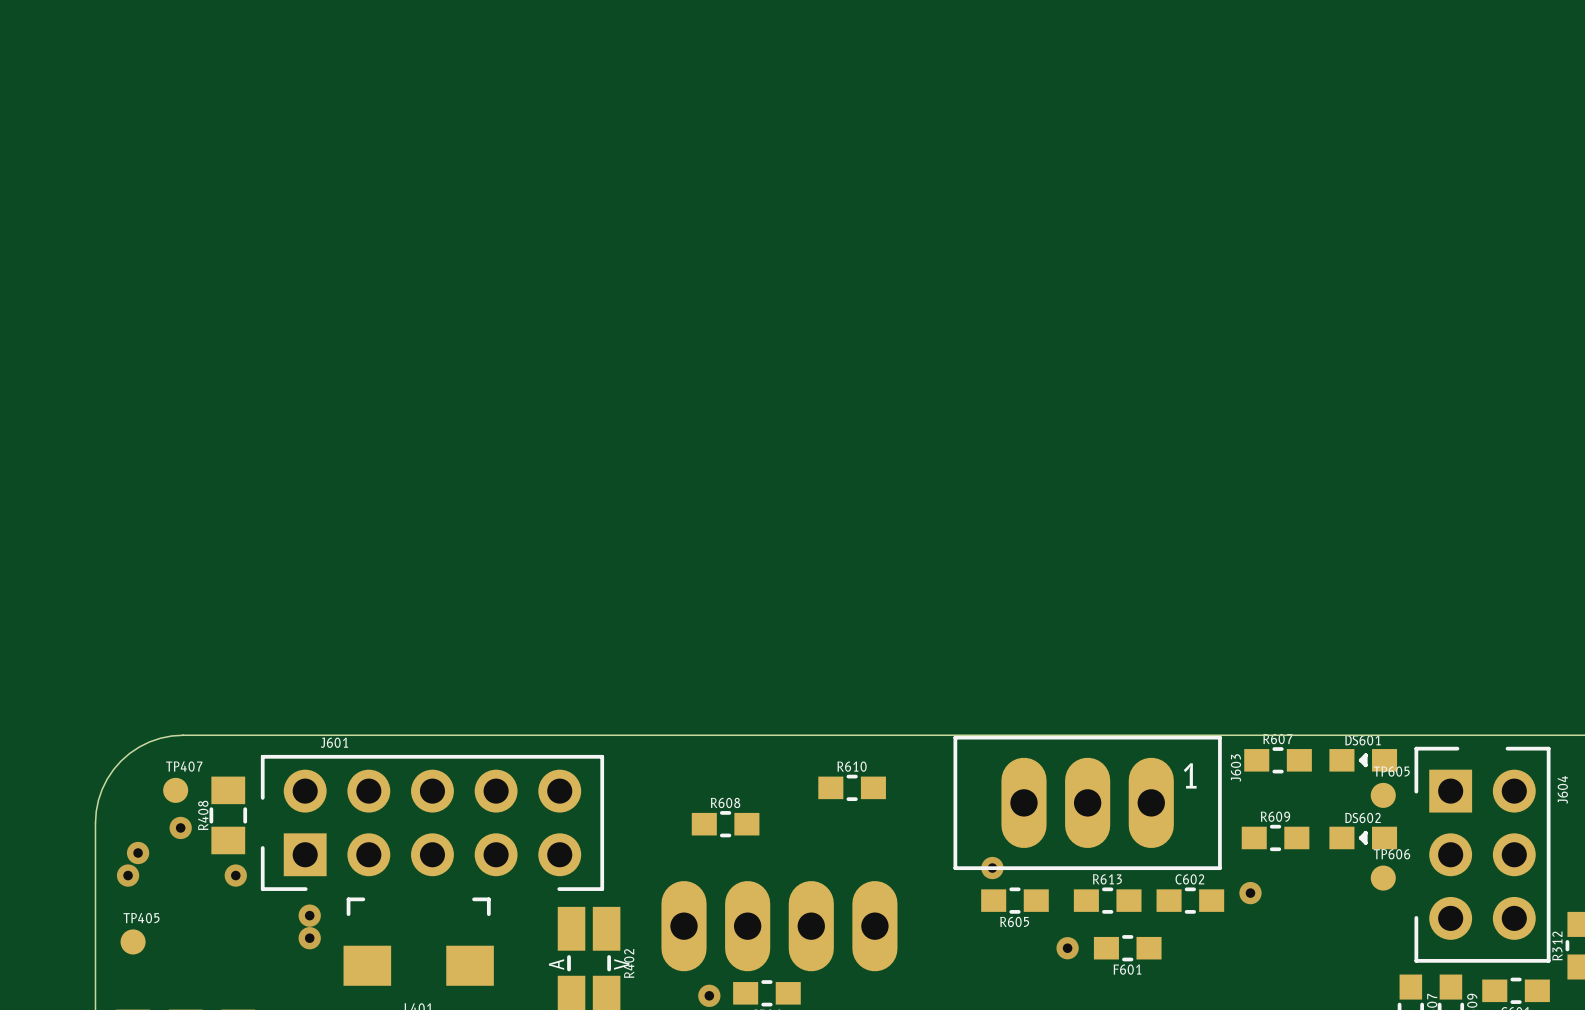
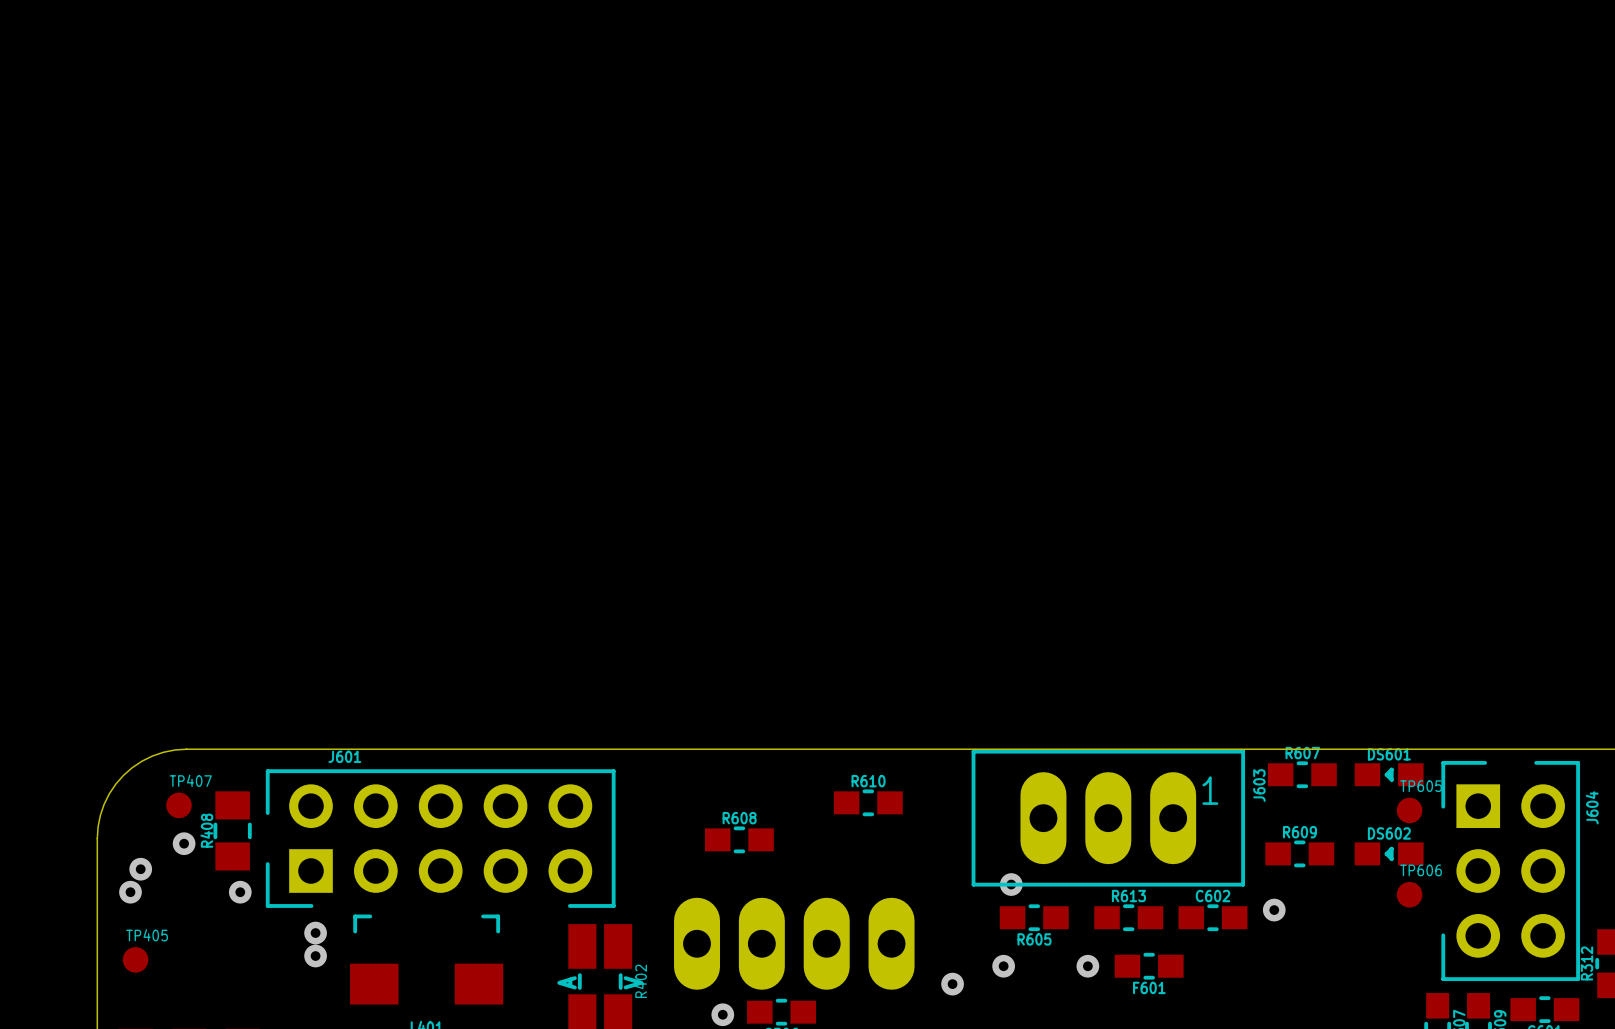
via: none -> (1003, 966)
via: none -> (952, 984)

